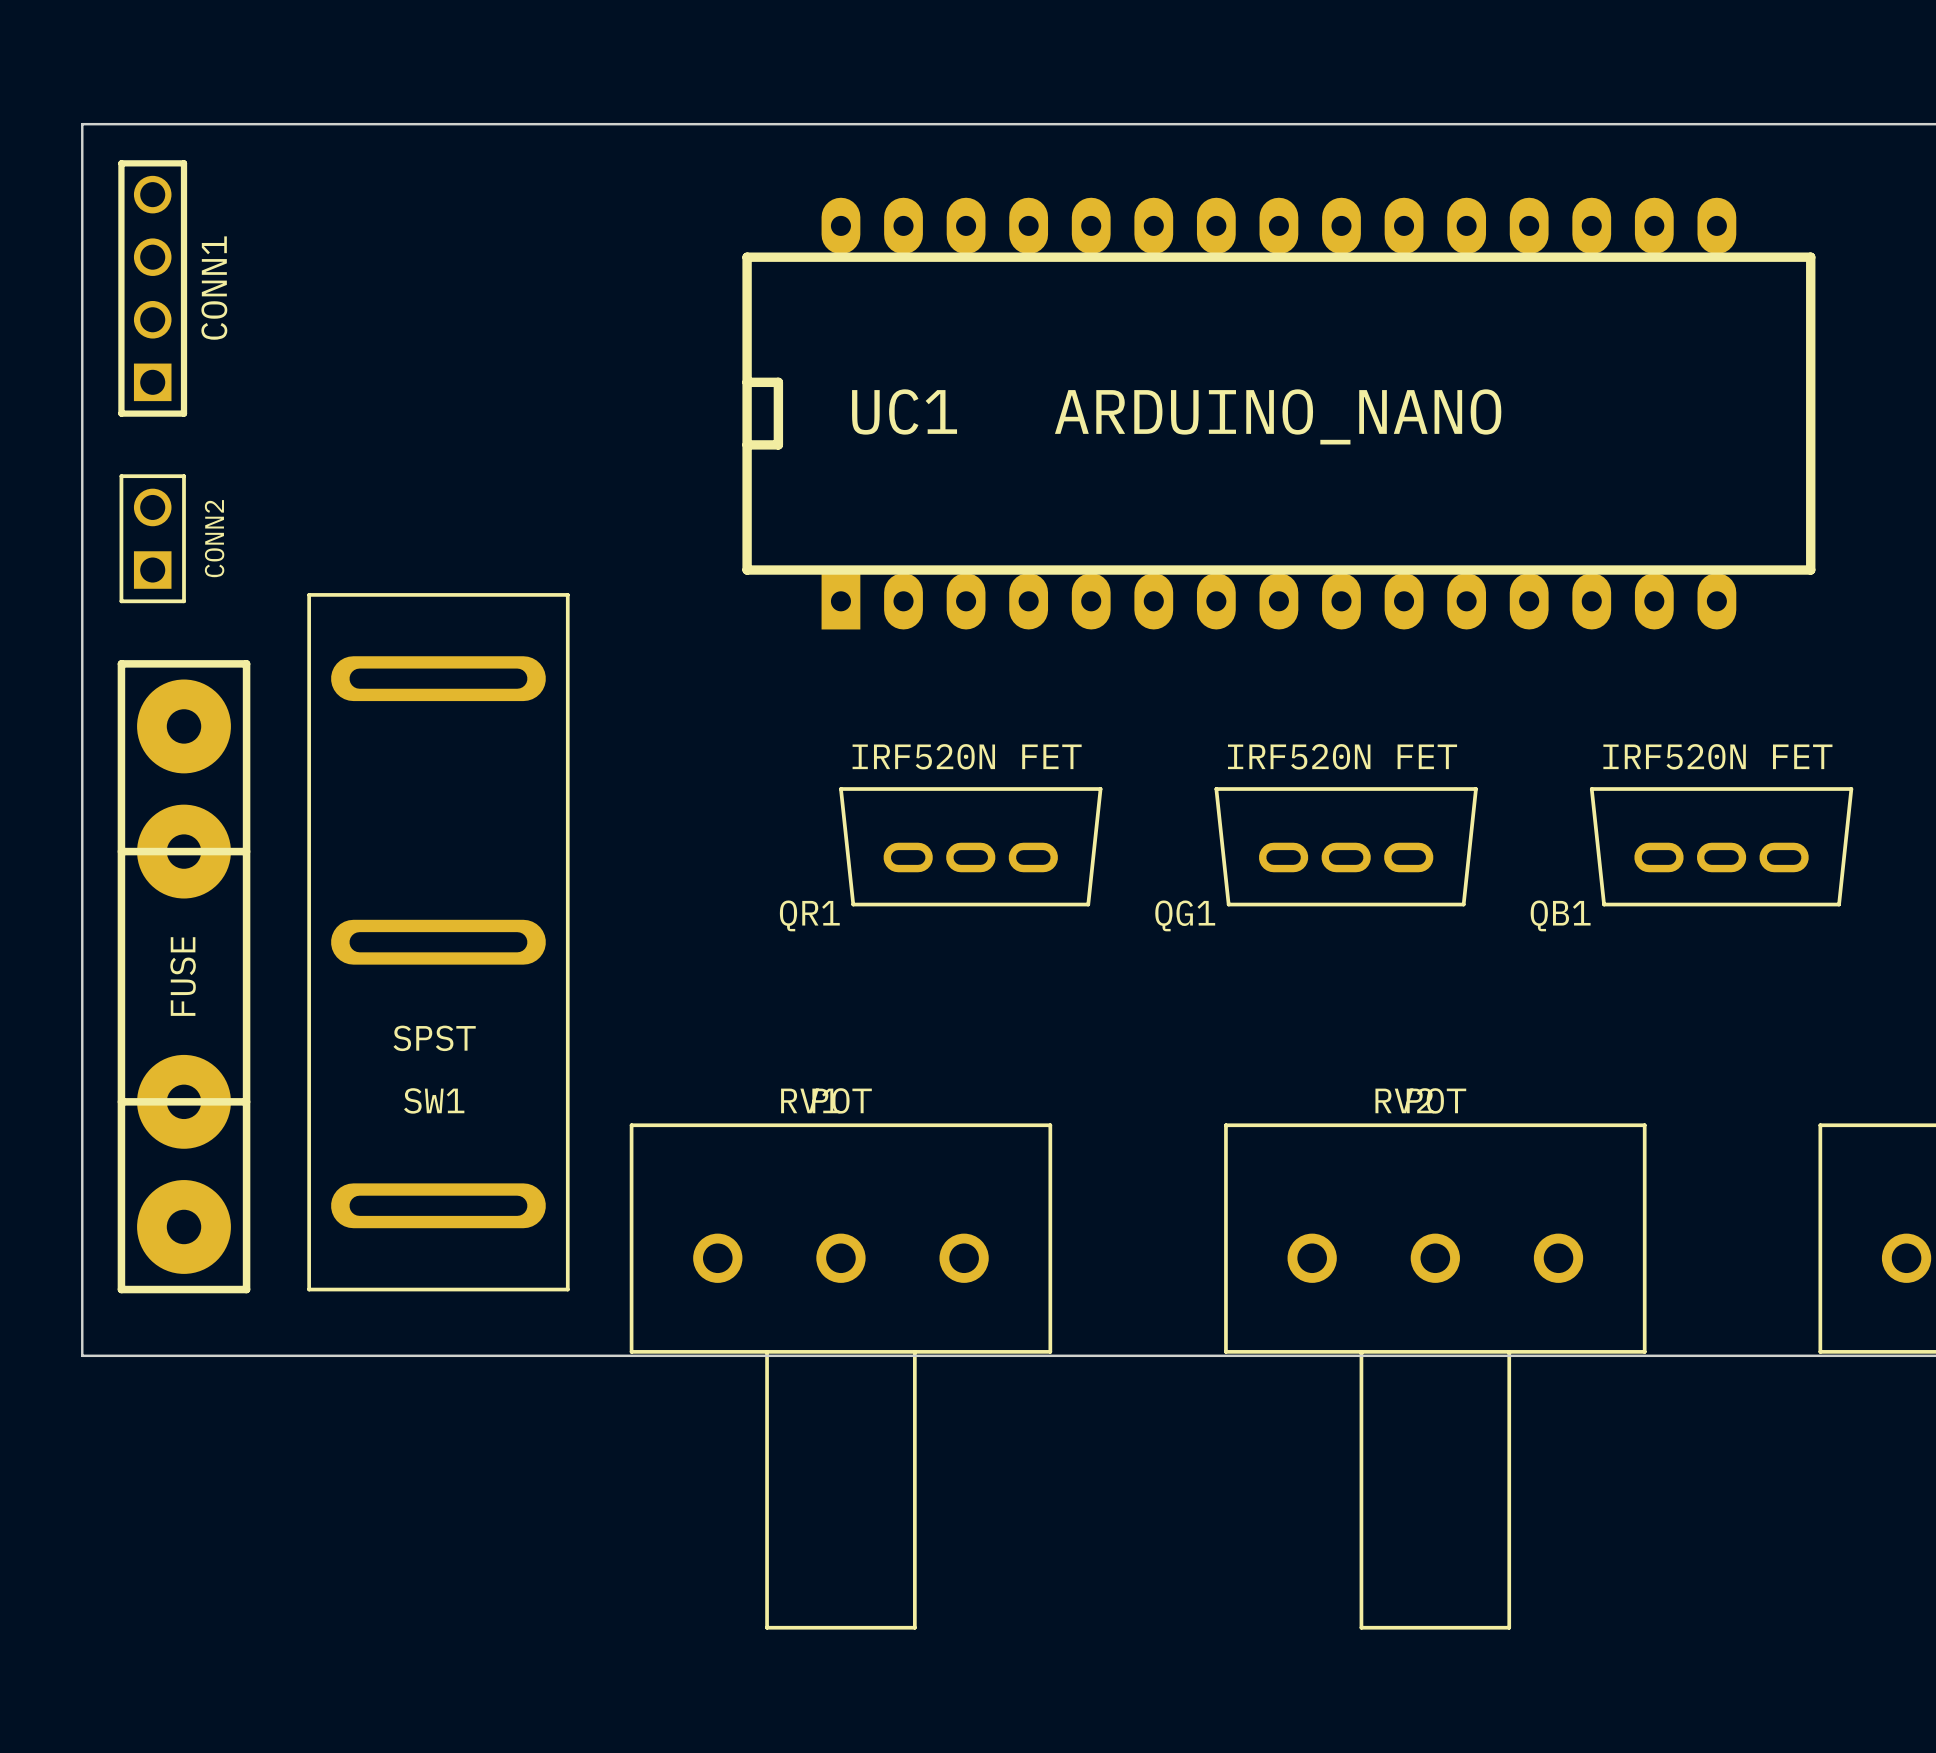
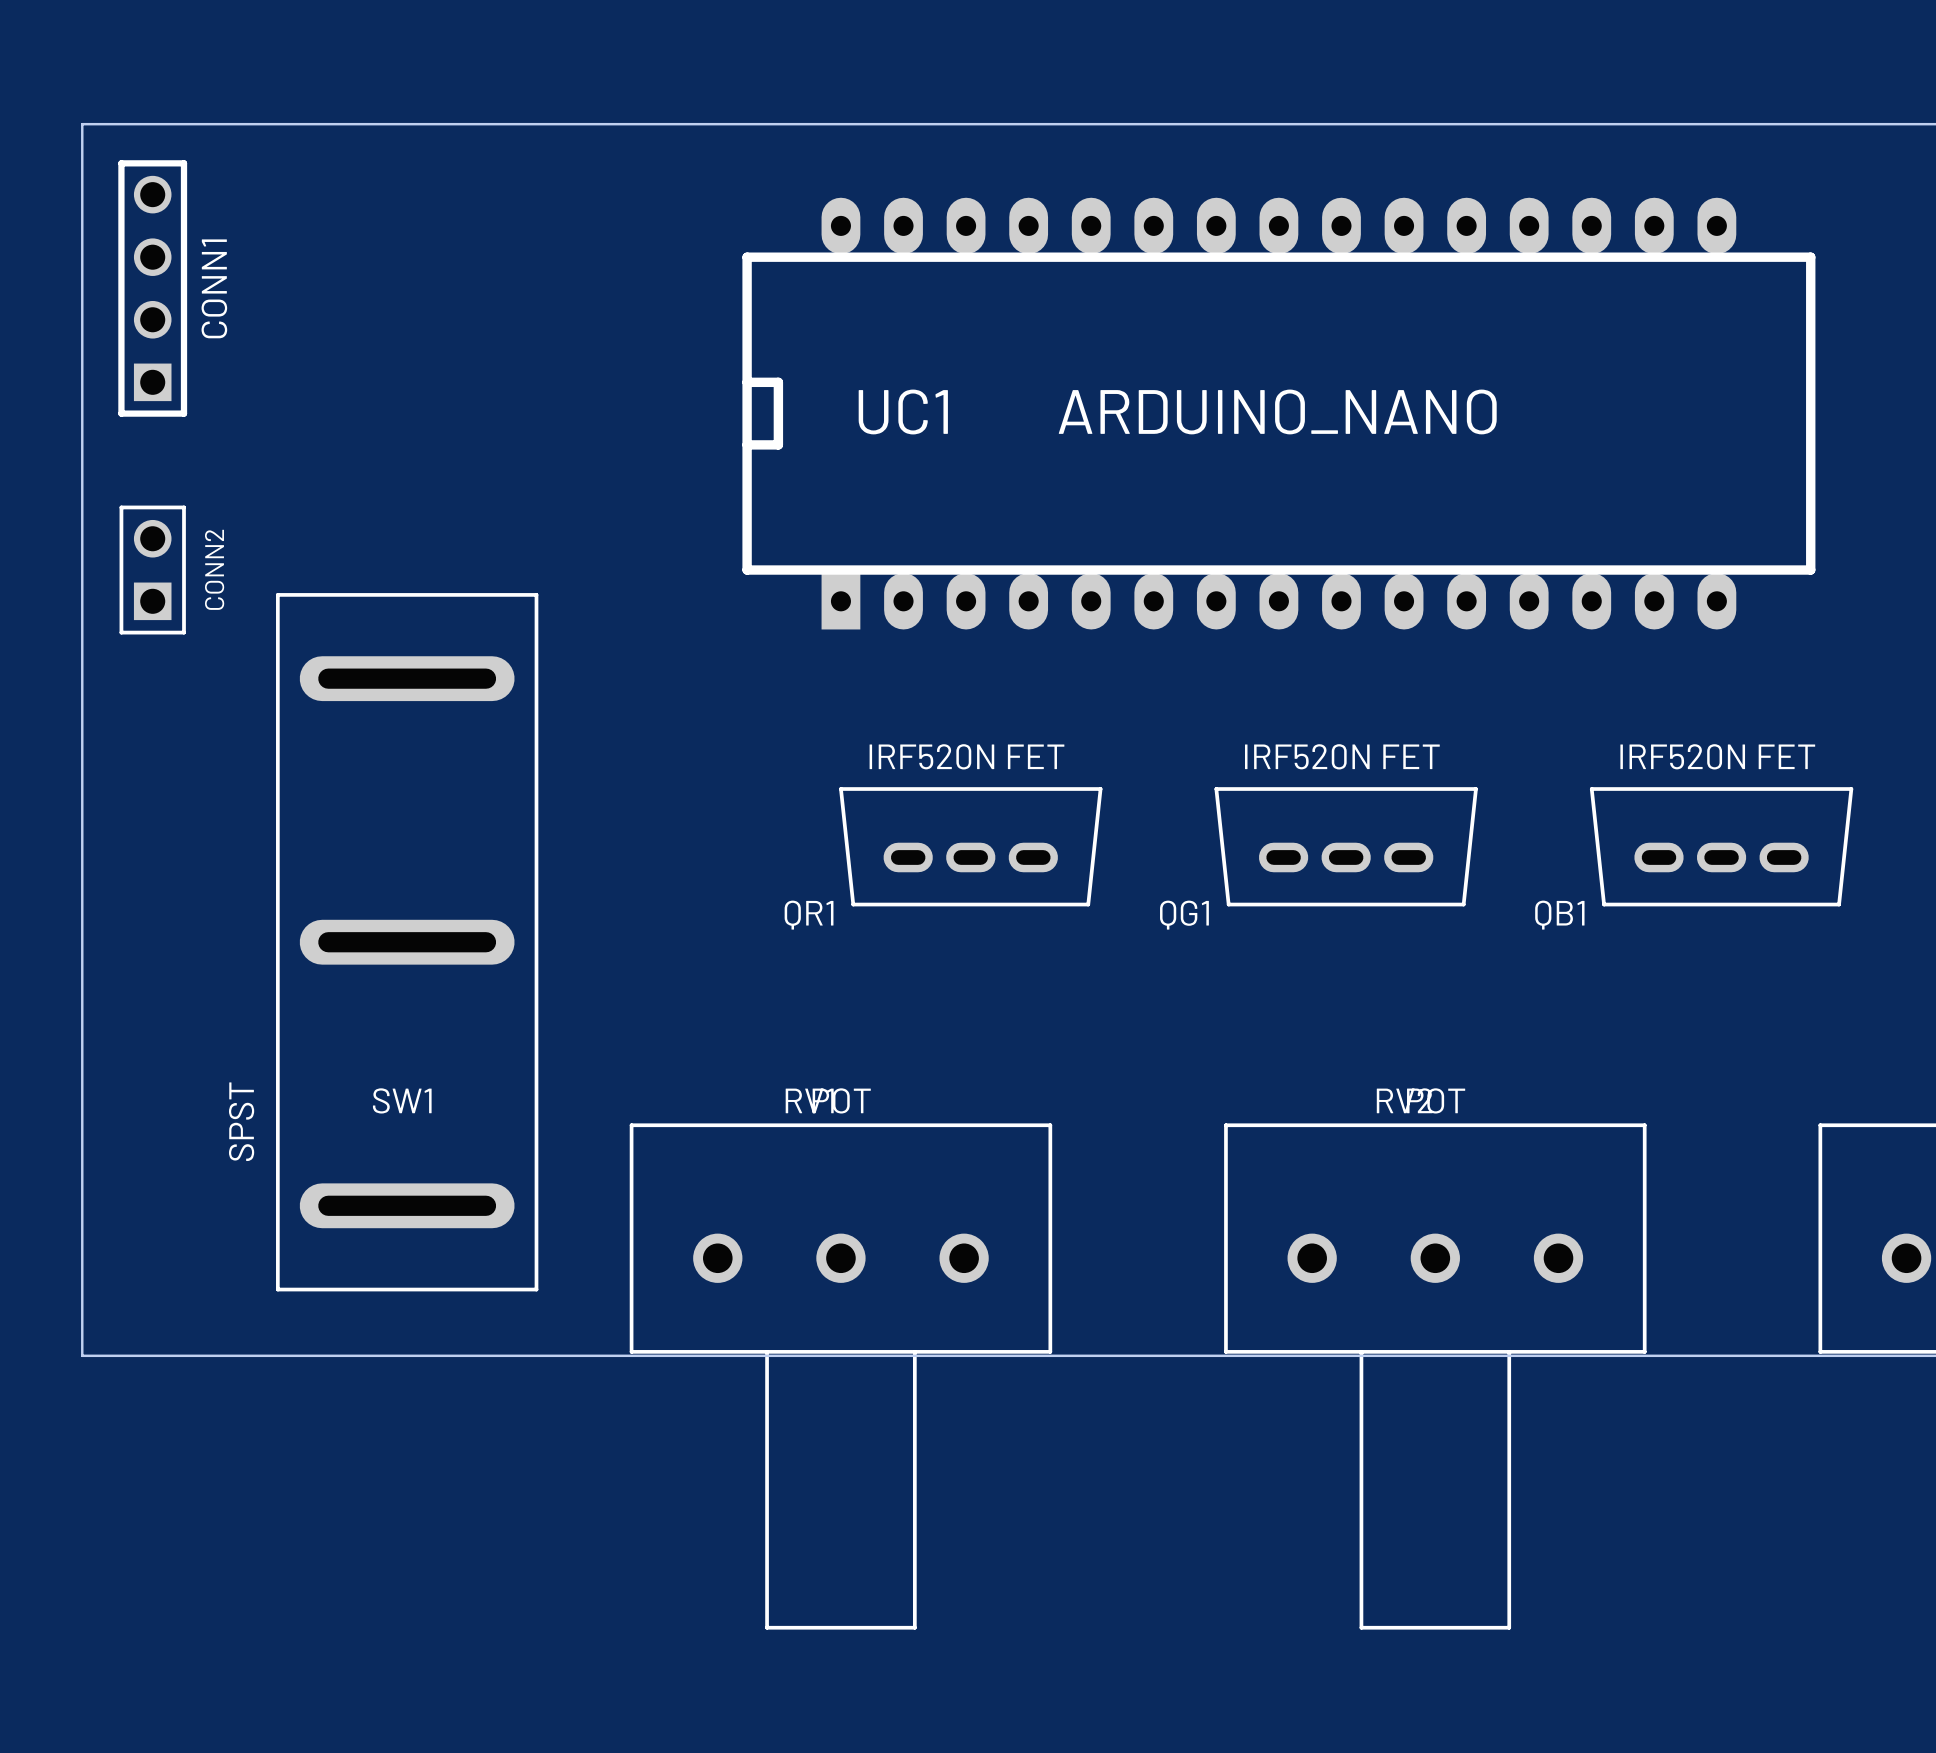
CONN2 position: (152, 538) -> (152, 570)
SW1 position: (438, 942) -> (407, 942)
part: FUSE (184, 976) -> none
SW1 value rotation: 0° (434, 1038) -> 90° counterclockwise (241, 1121)
SW1 value position: SPST (434, 1038) -> SPST (241, 1121)

